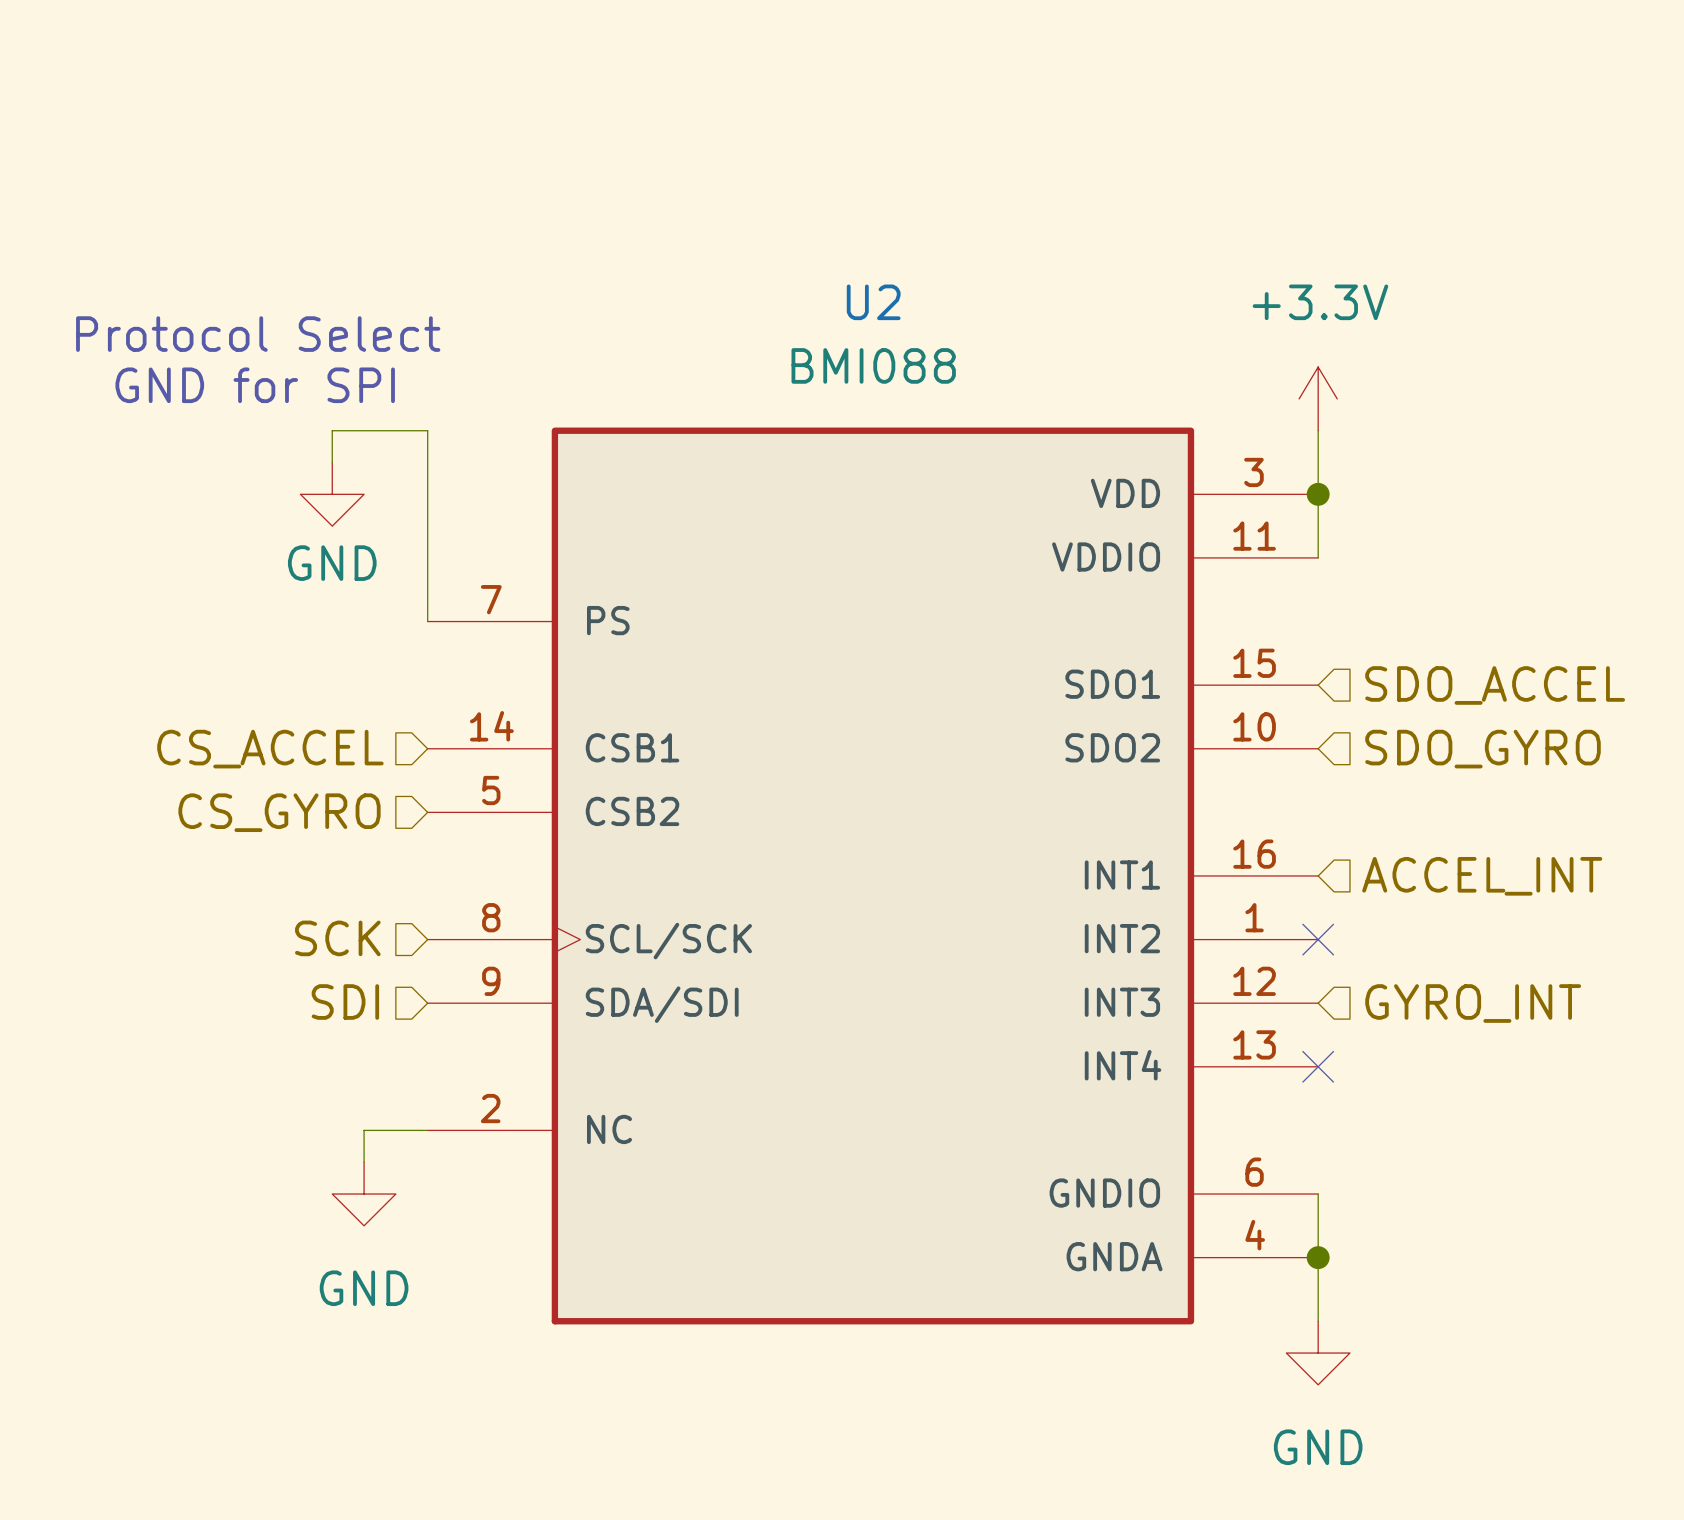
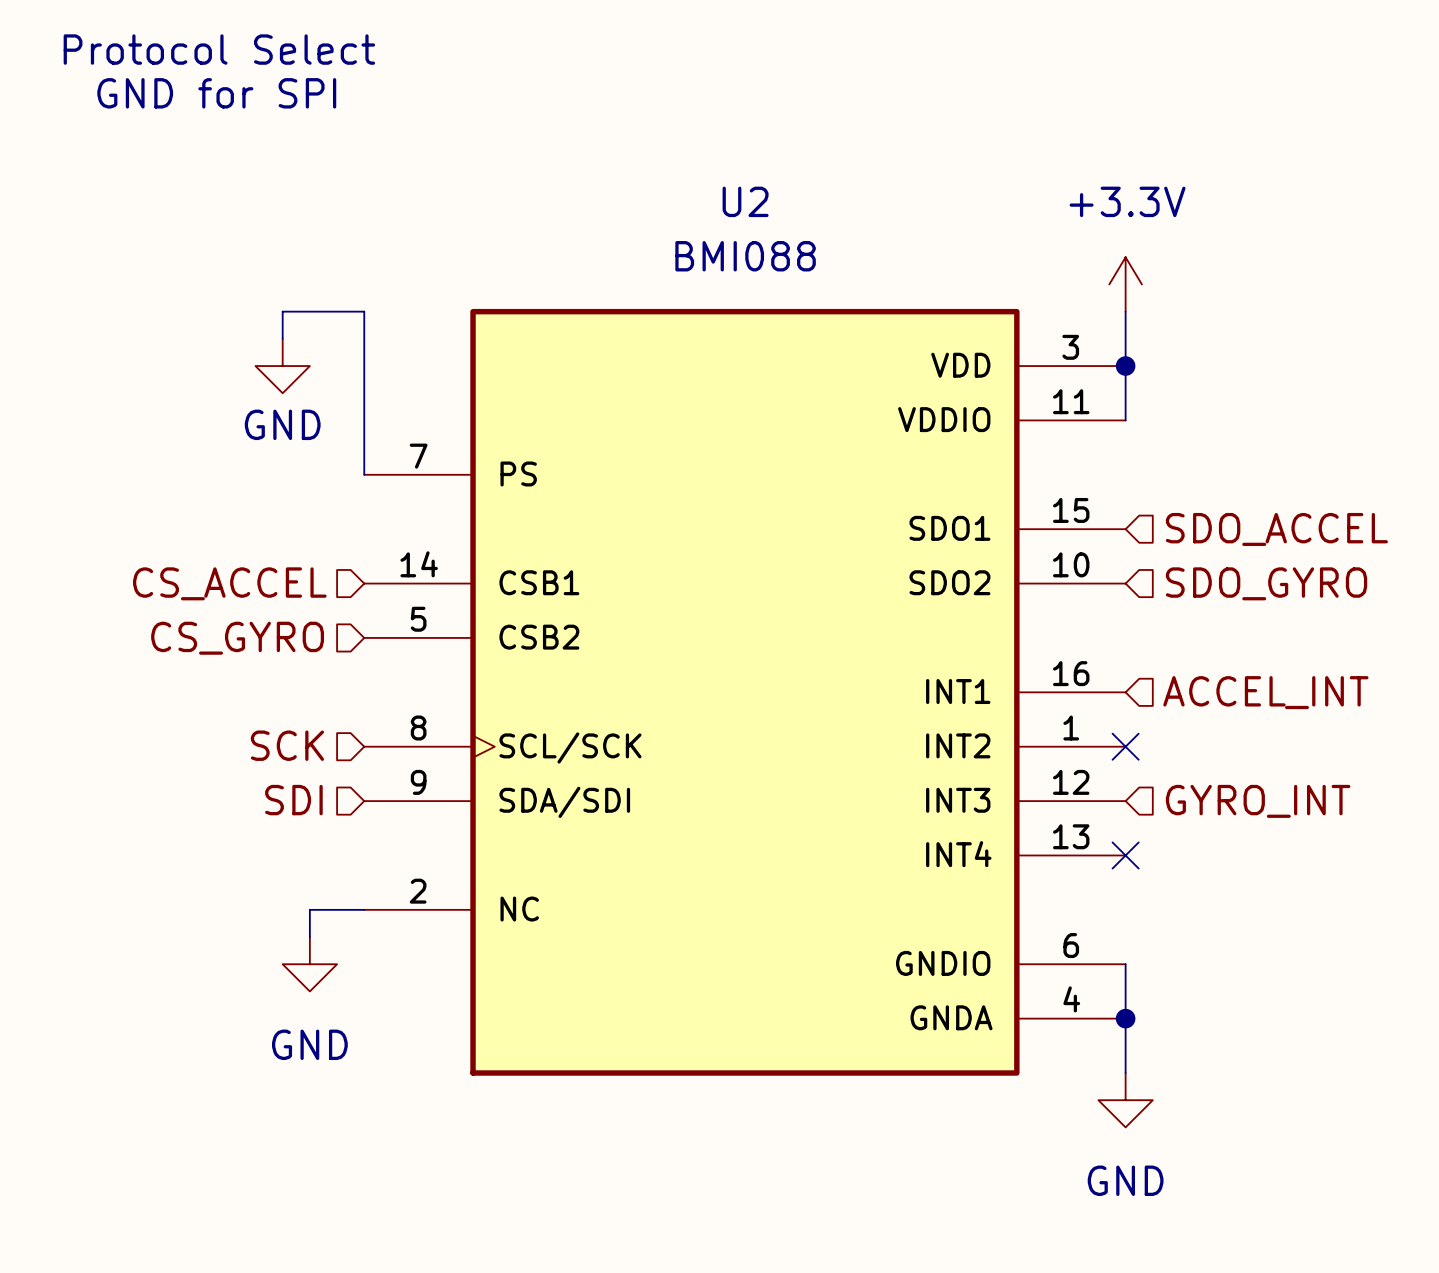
text position: Protocol Select (258, 334) -> Protocol Select (219, 49)
text position: GND for SPI (255, 385) -> GND for SPI (216, 93)

